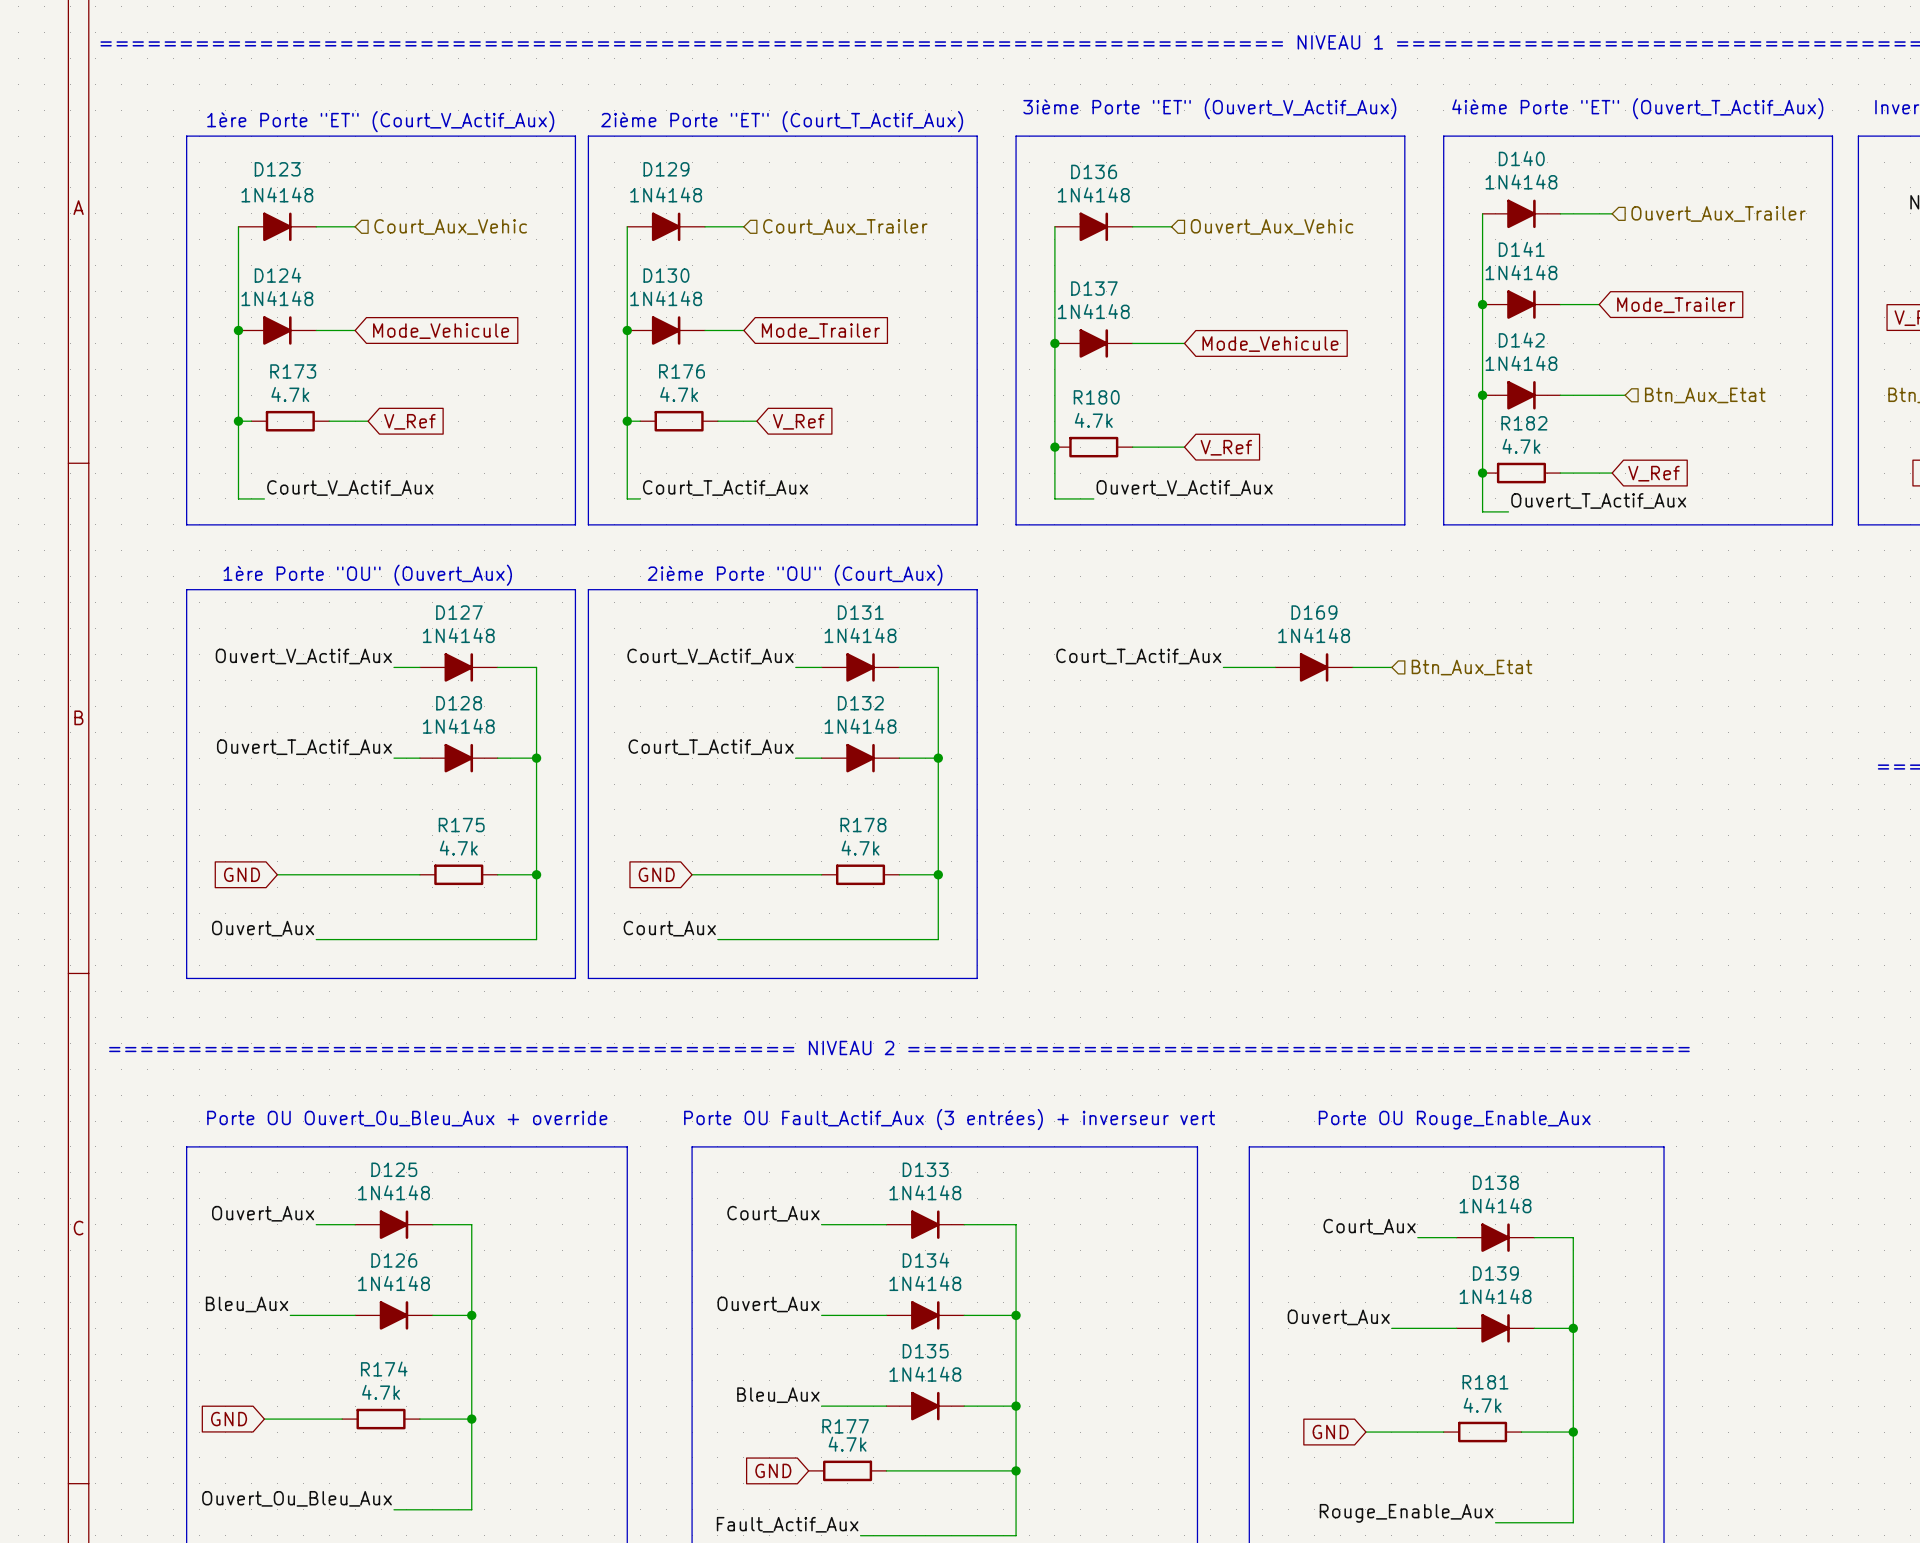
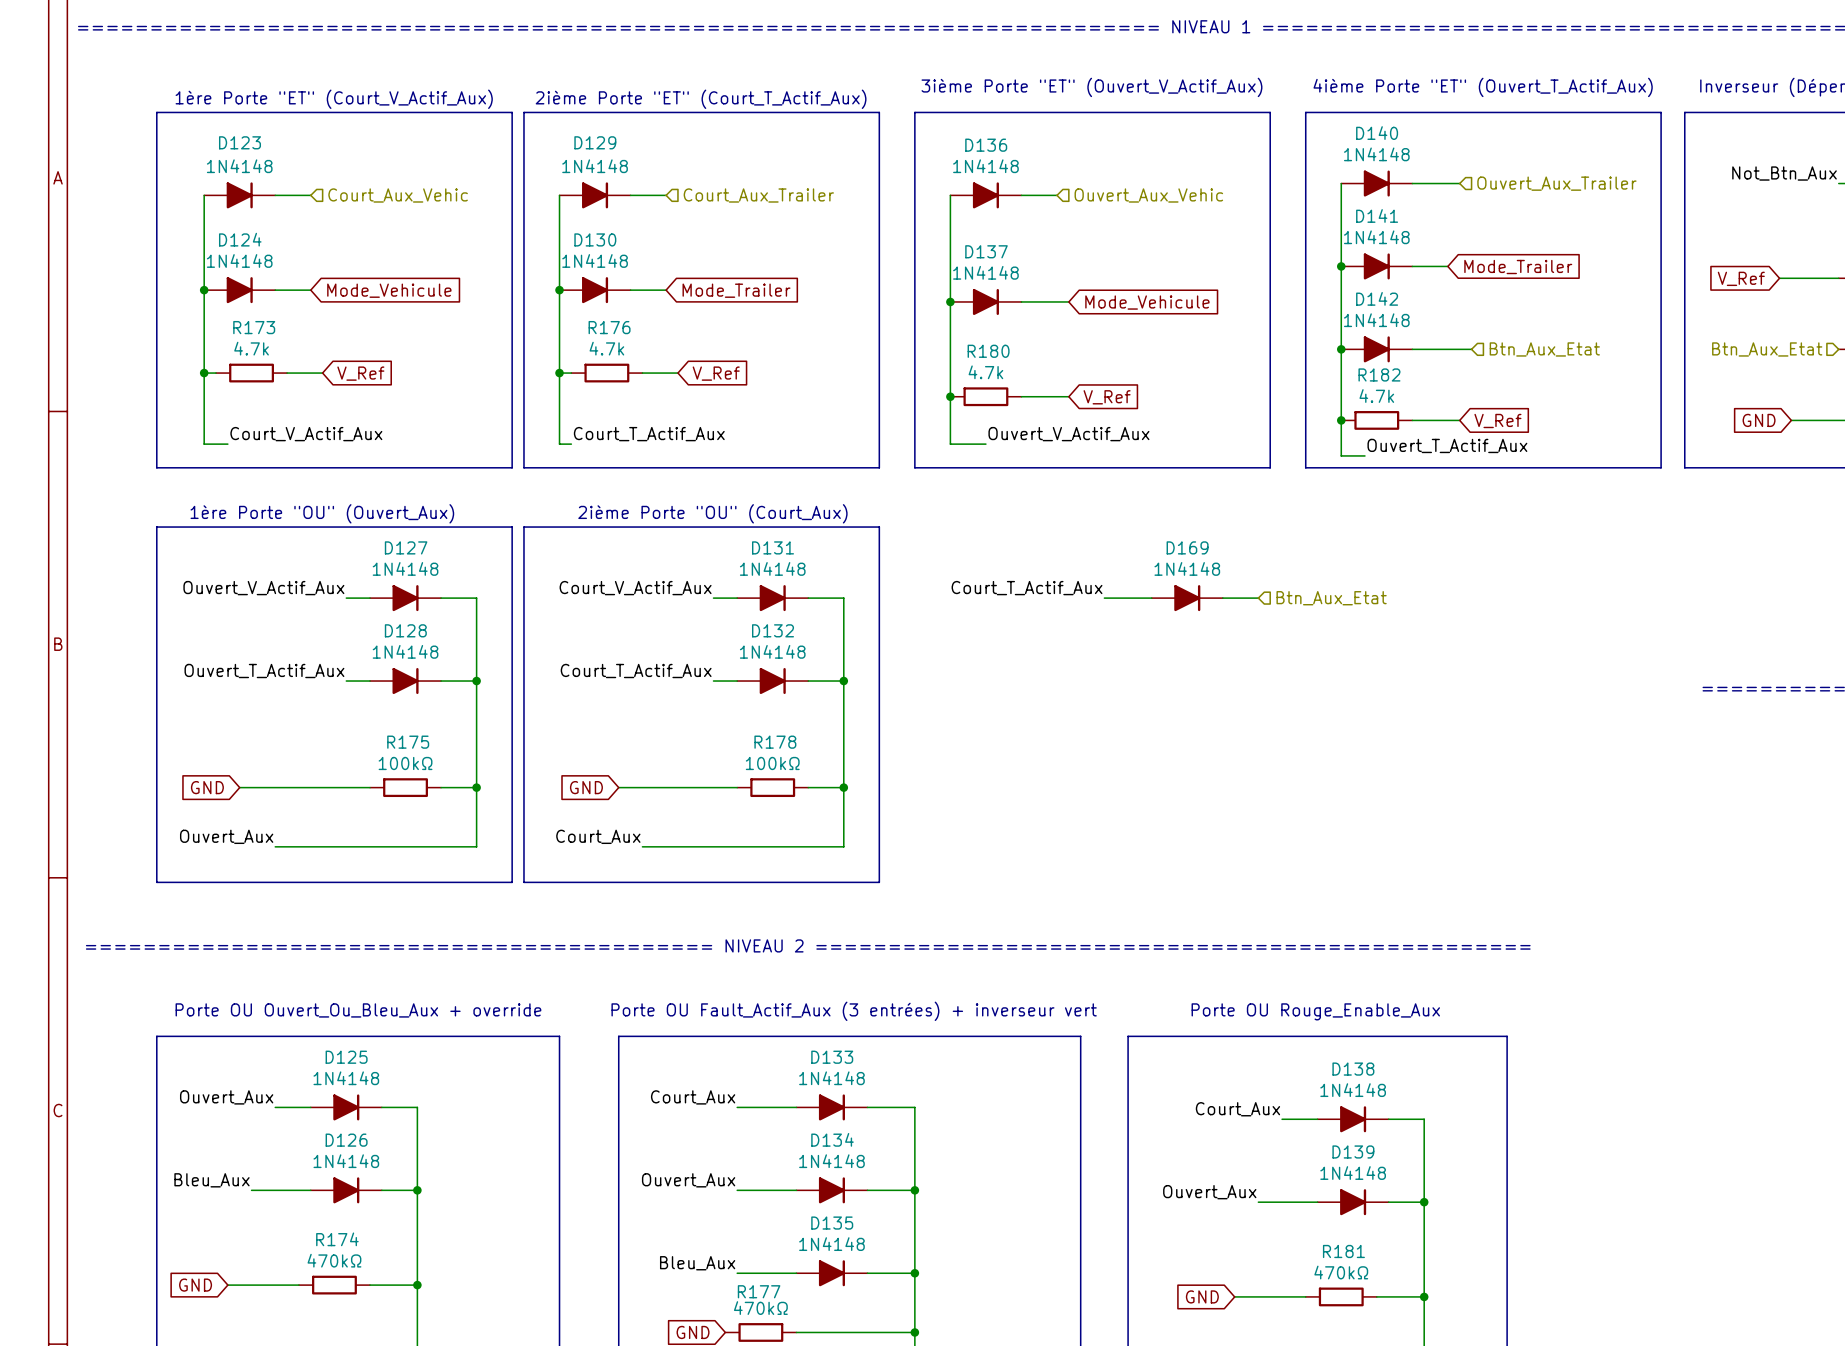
R175 value: 4.7k (458, 848) -> 100kΩ (405, 763)
R178 value: 4.7k (860, 848) -> 100kΩ (772, 763)
R174 value: 4.7k (381, 1392) -> 470kΩ (334, 1260)
R181 value: 4.7k (1482, 1405) -> 470kΩ (1341, 1272)
R177 value: 4.7k (847, 1444) -> 470kΩ (760, 1308)

